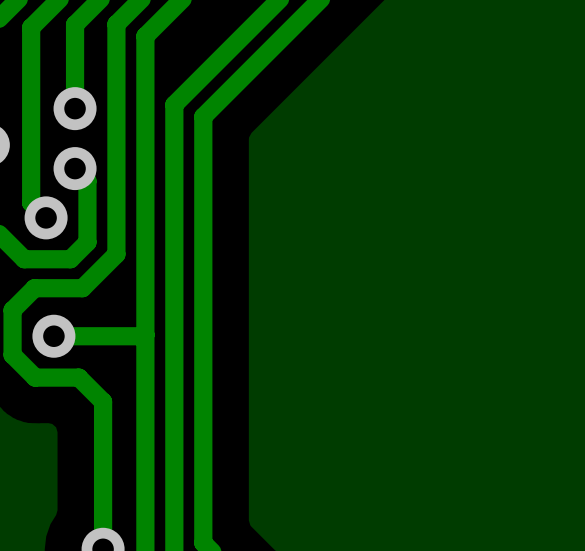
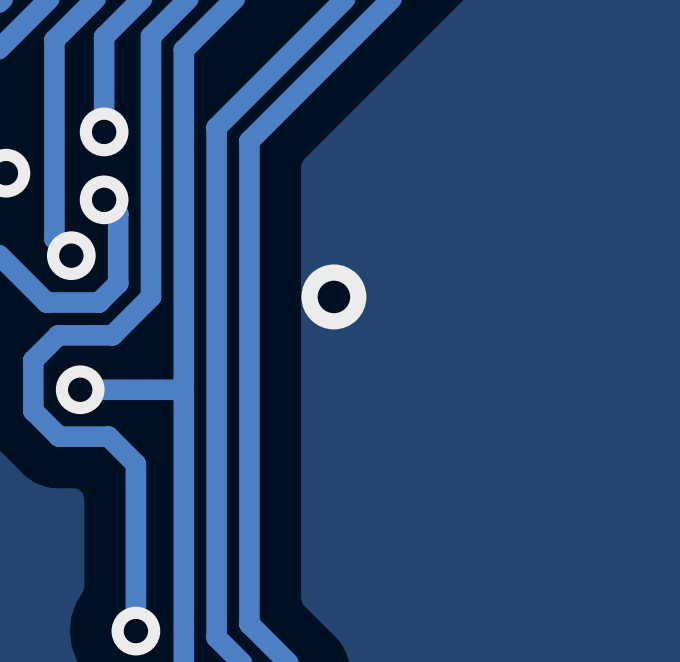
via: none -> (333, 296)

